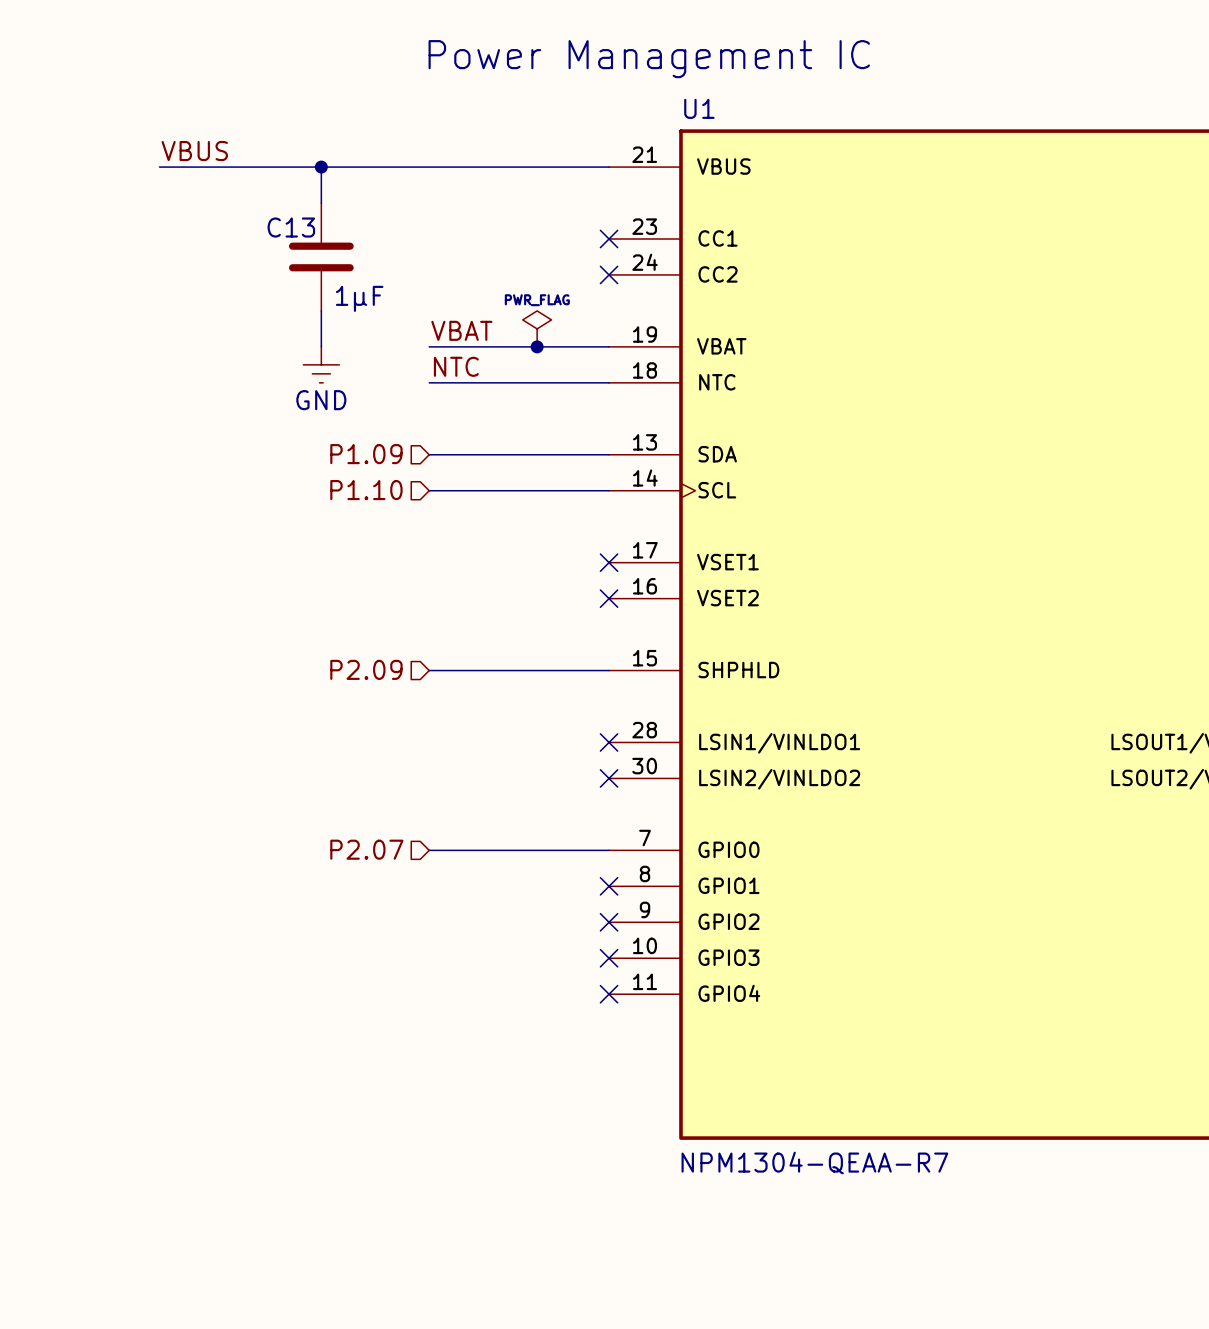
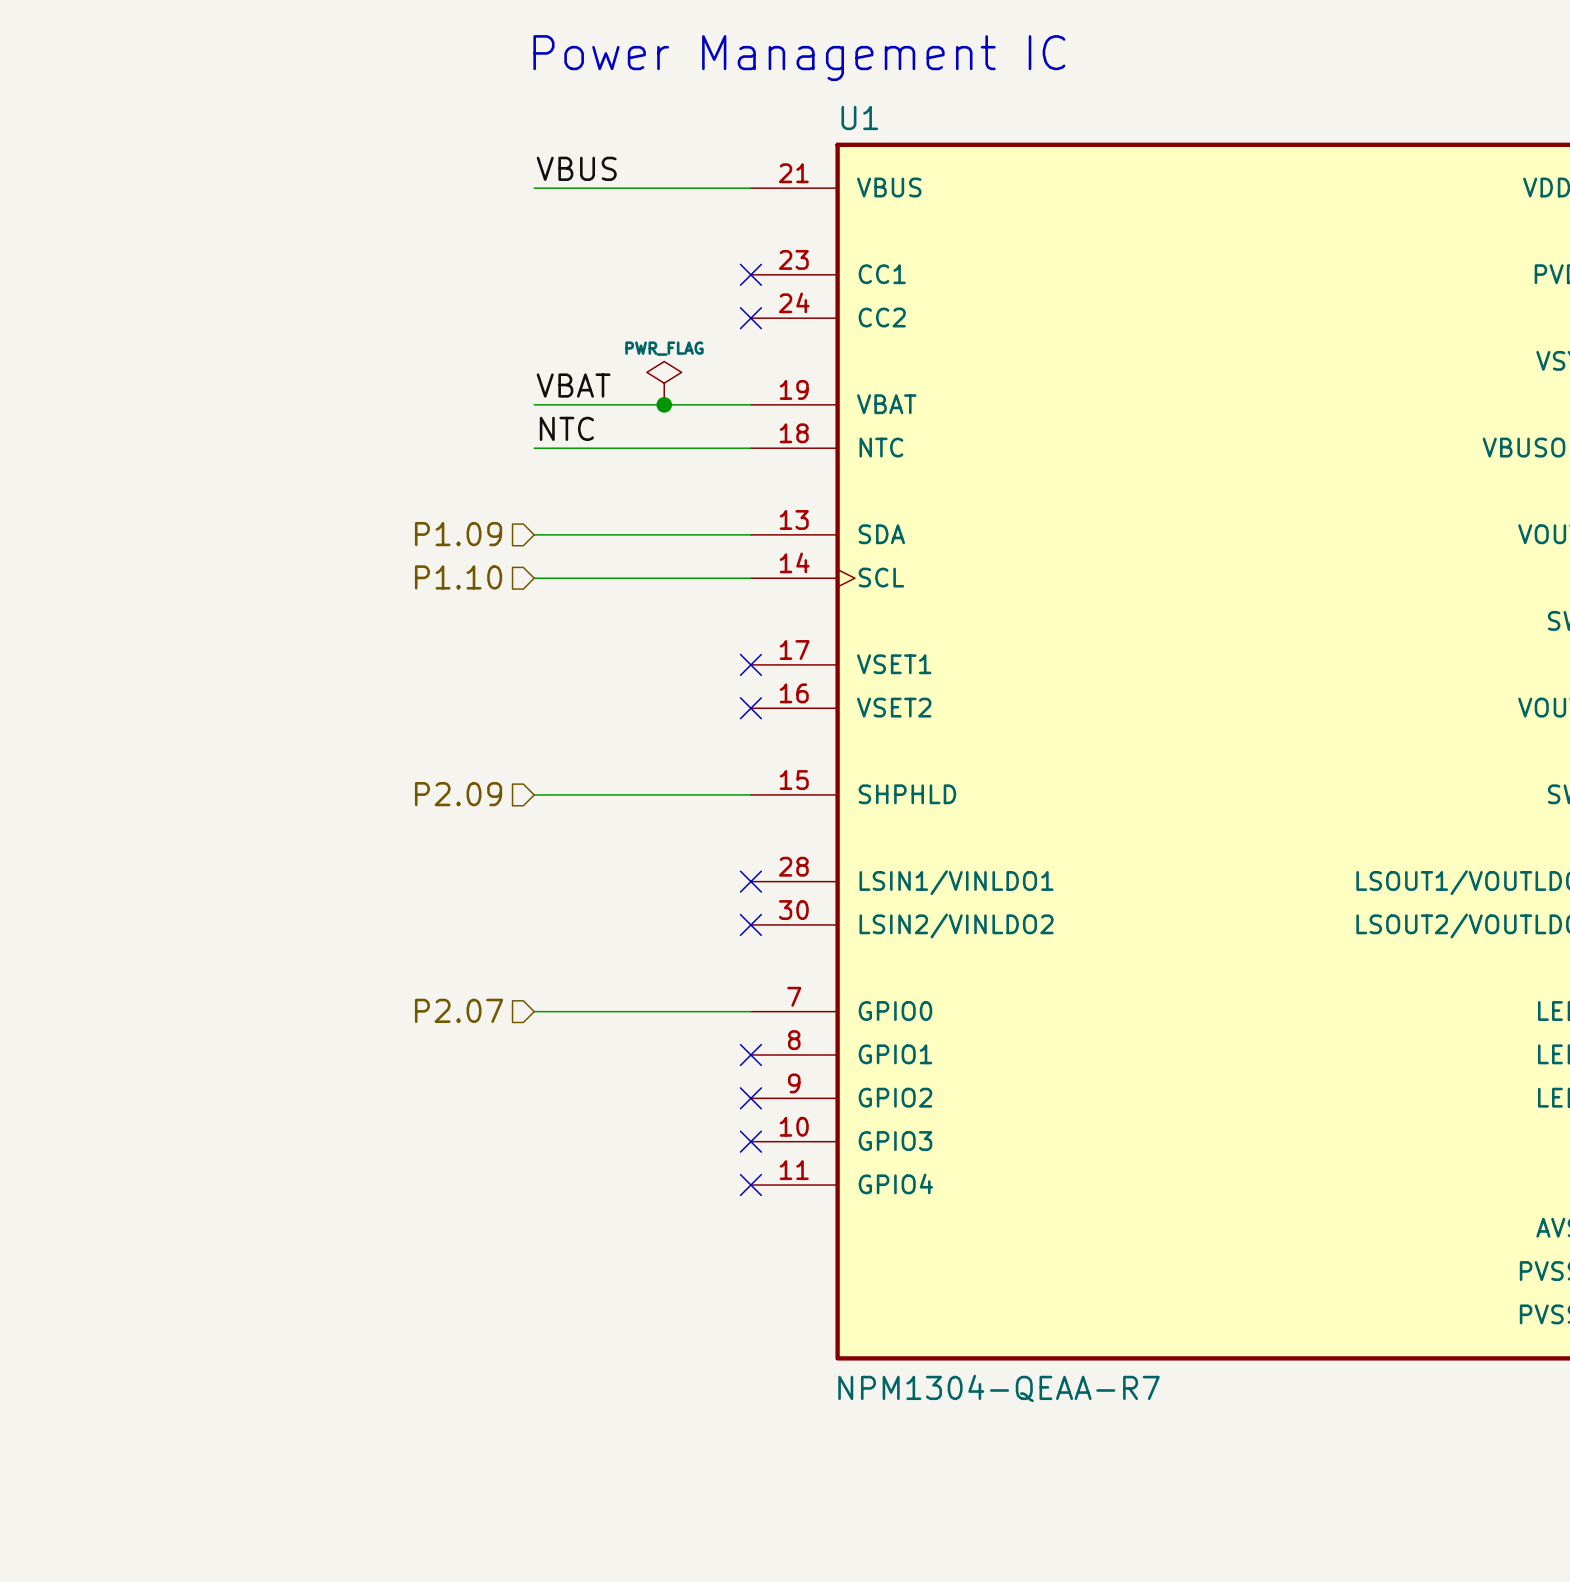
label position: VBUS (194, 151) -> VBUS (576, 168)
wire: (159, 167) (429, 167) -> none
wire: (321, 167) (321, 203) -> none
junction: (321, 167) -> none
C13: 1µF (321, 256) -> none
wire: (321, 310) (321, 346) -> none
power symbol: GND (321, 364) -> none

